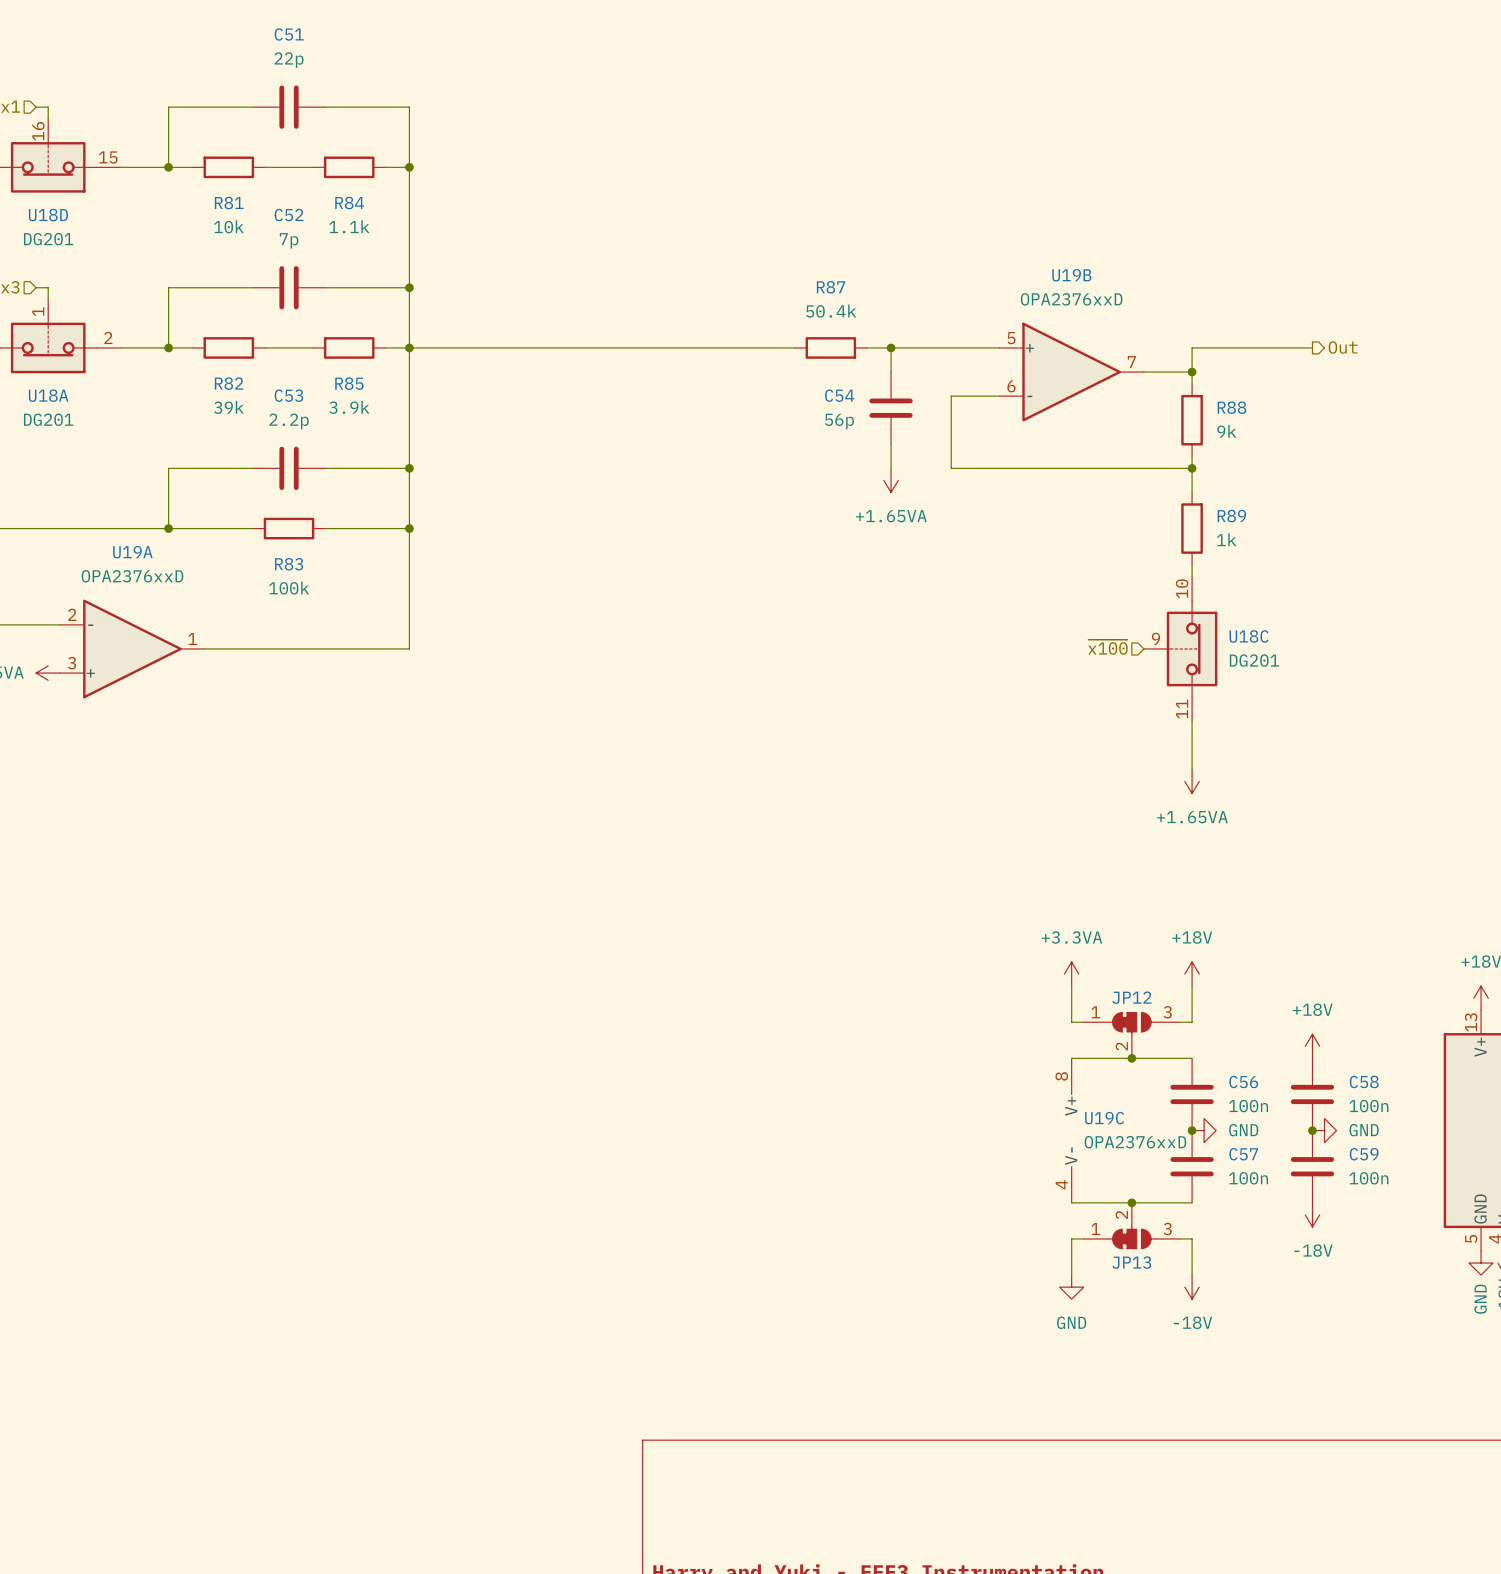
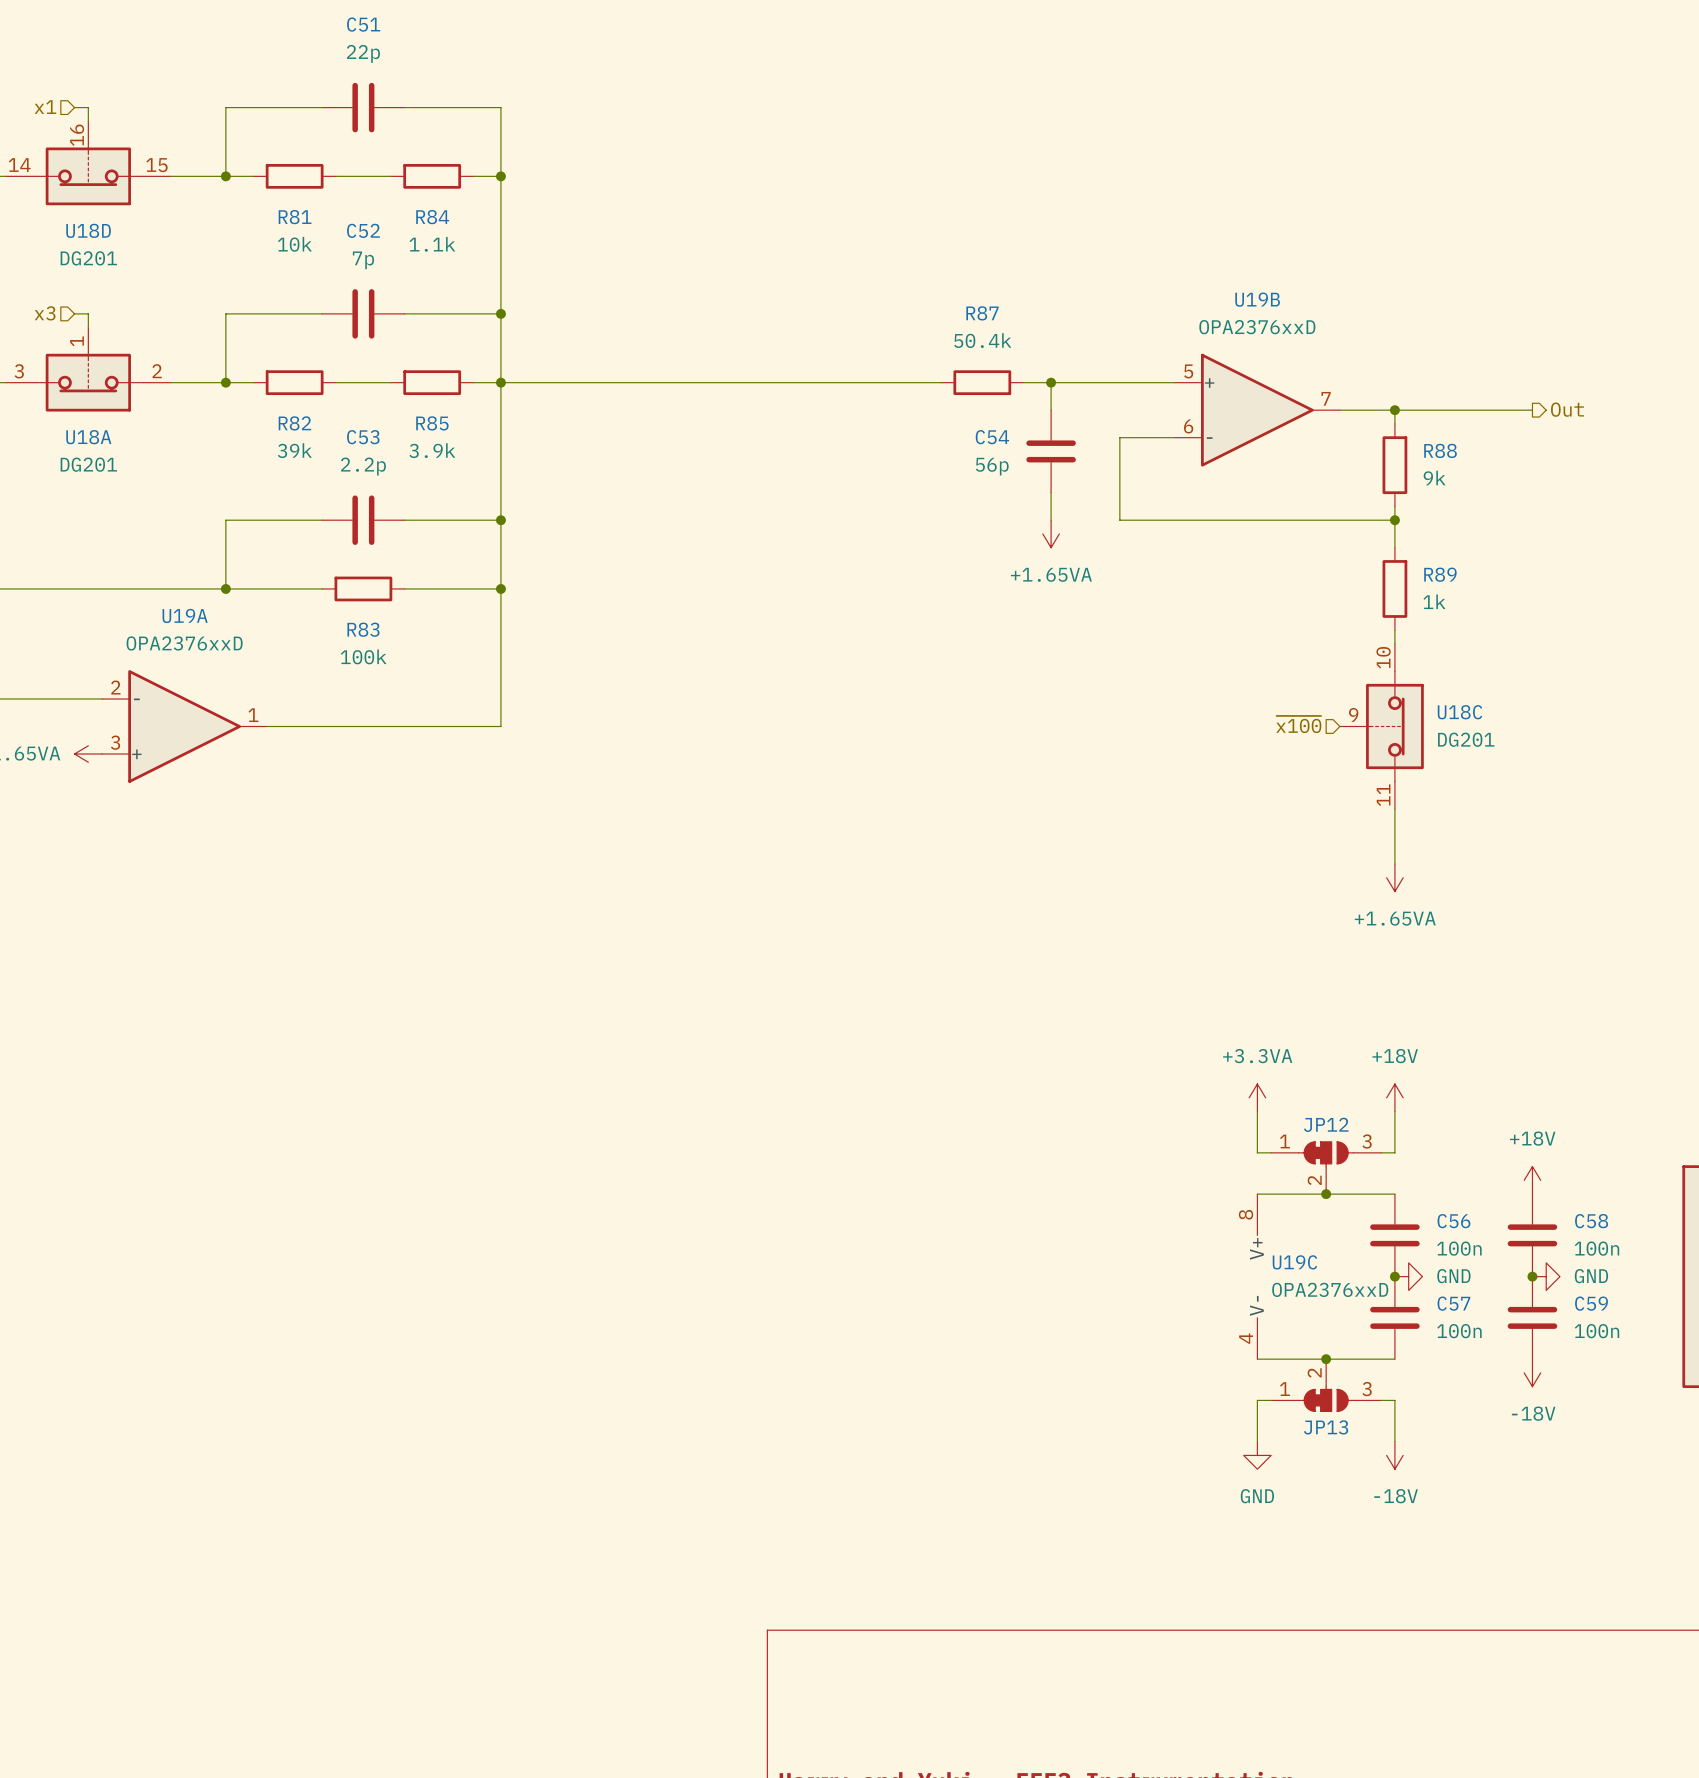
wire: (1312, 347) (1192, 347) (1192, 372) -> (1532, 410) (1394, 410)
hierarchical label position: Out (1343, 347) -> Out (1567, 409)

